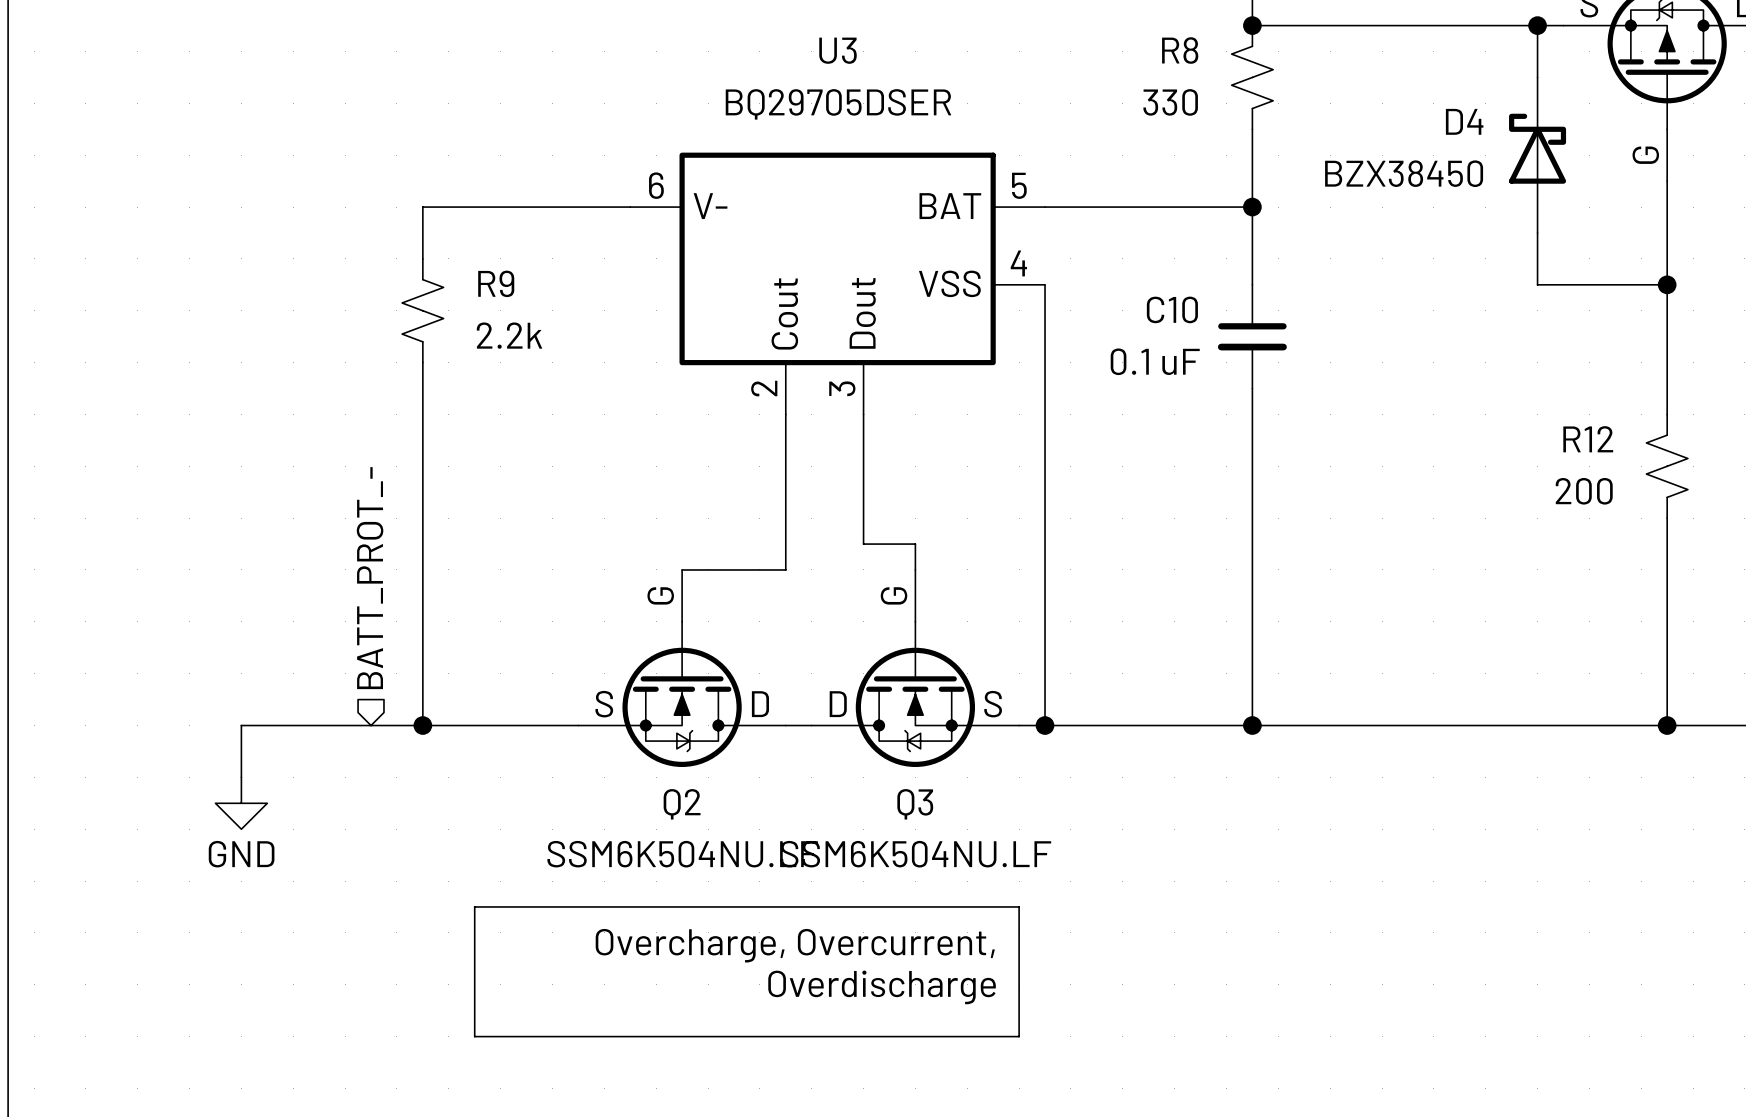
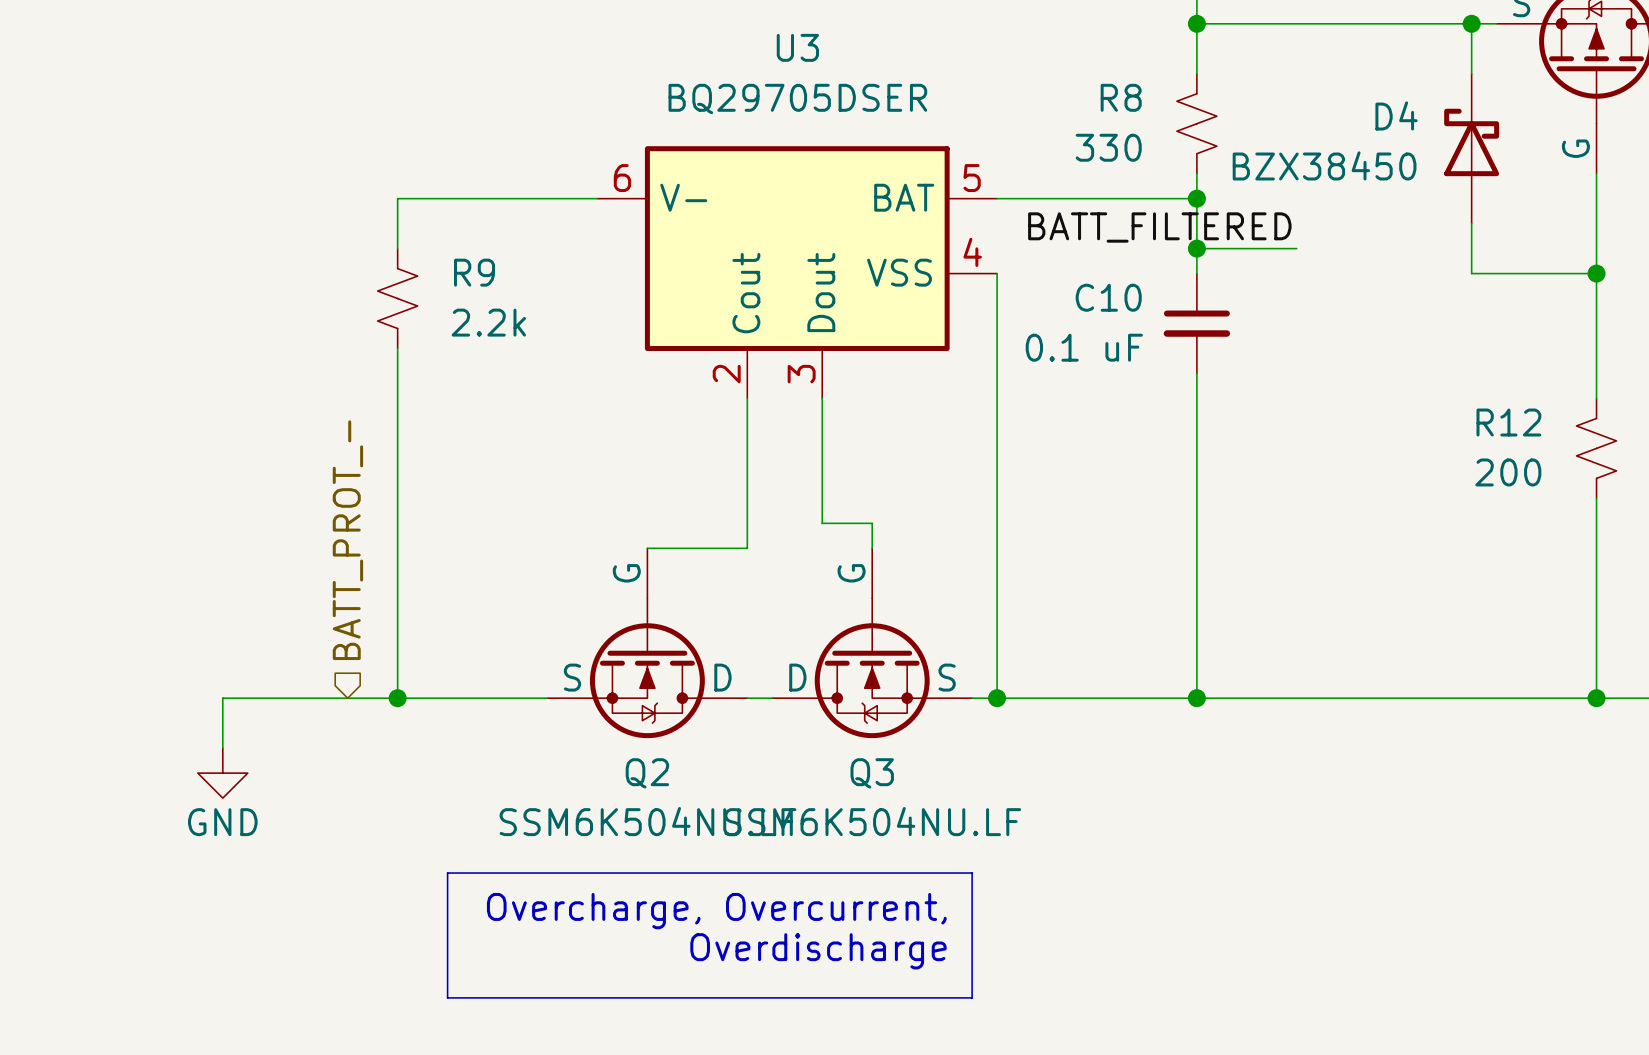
R8 position: (1252, 77) -> (1196, 123)
wire: (1252, 129) (1252, 181) -> (1196, 23) (1196, 73)
label: none -> BATT_FILTERED (1159, 227)
wire: none -> (1196, 248) (1296, 248)
junction: none -> (1196, 248)

